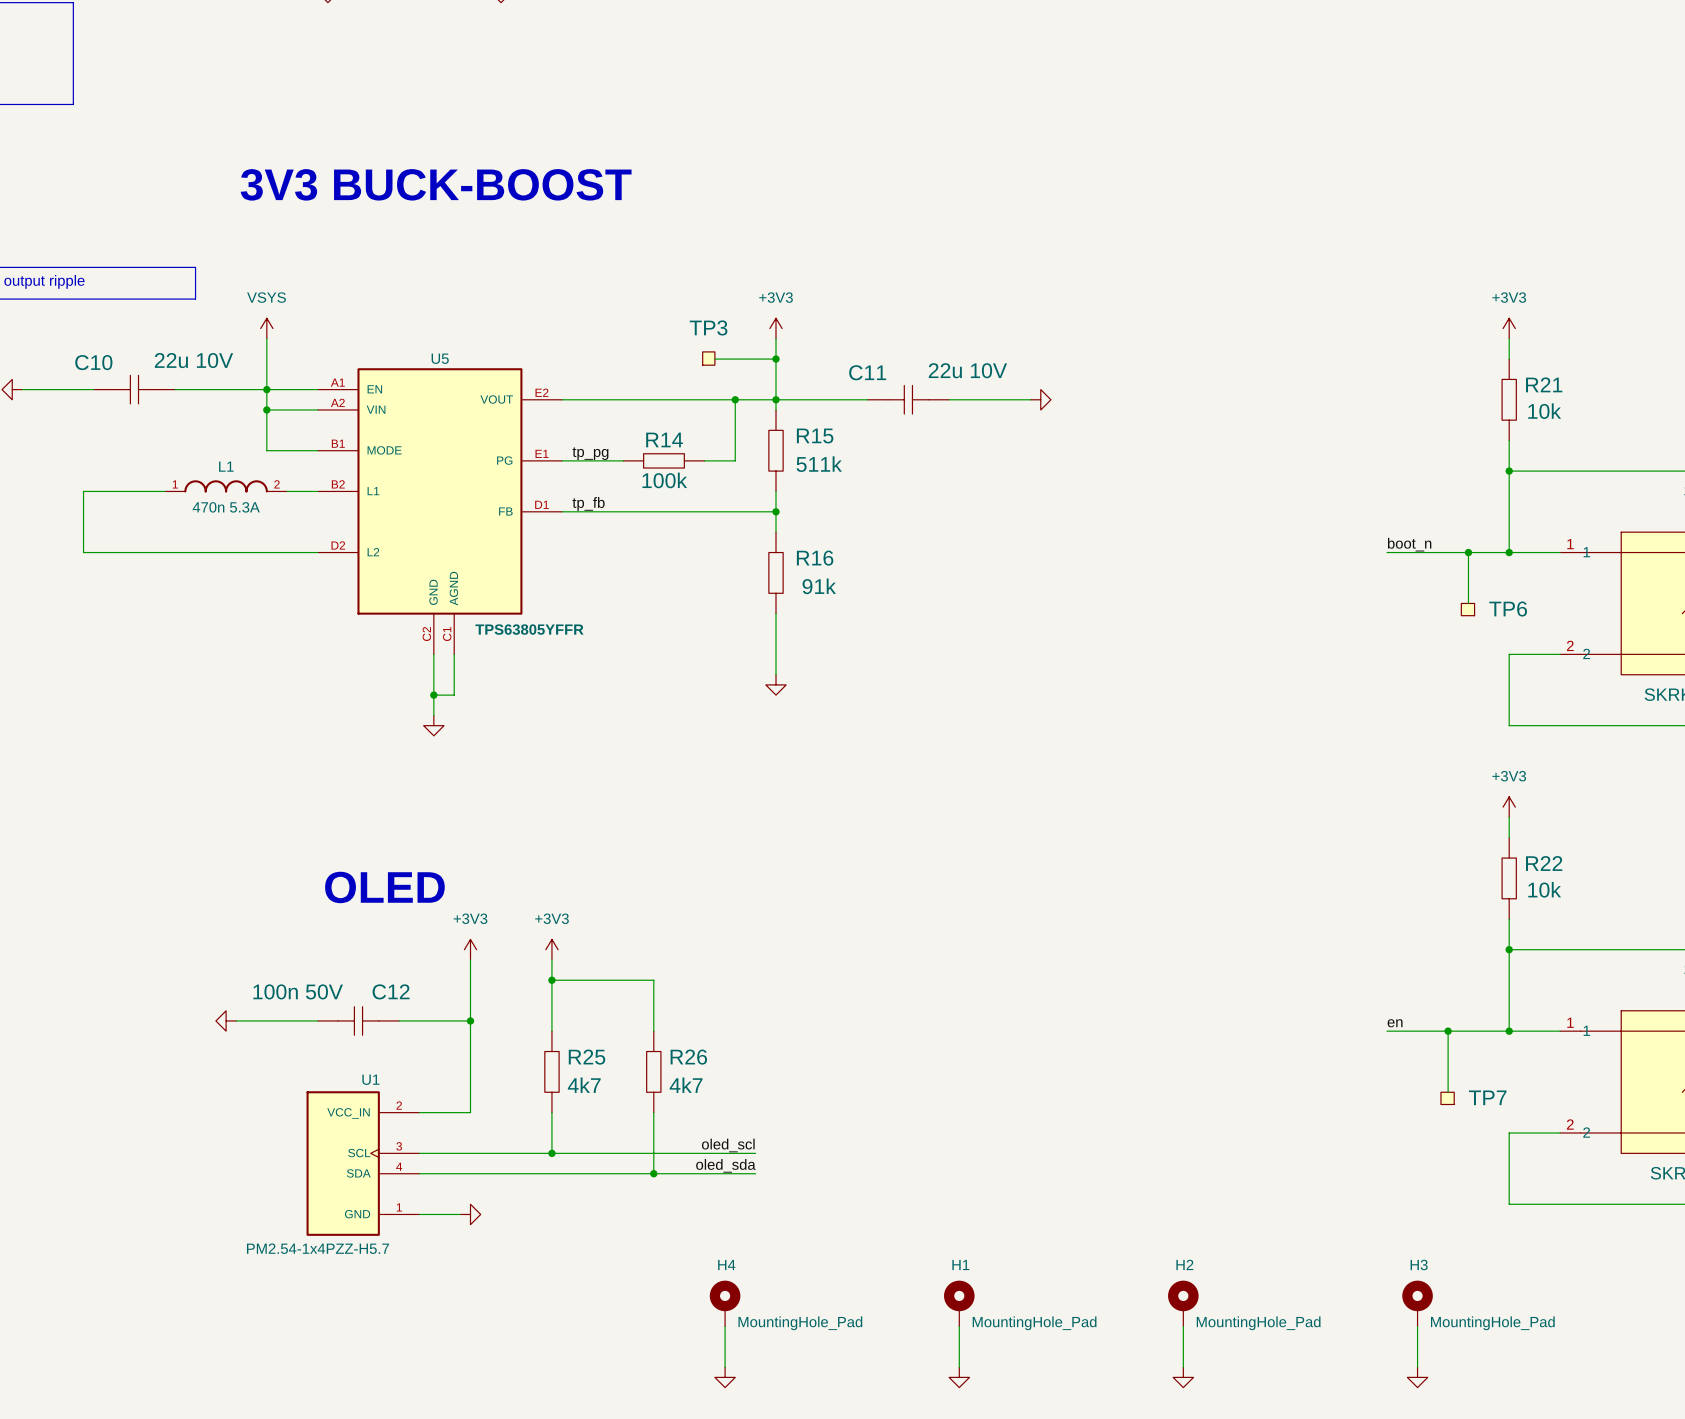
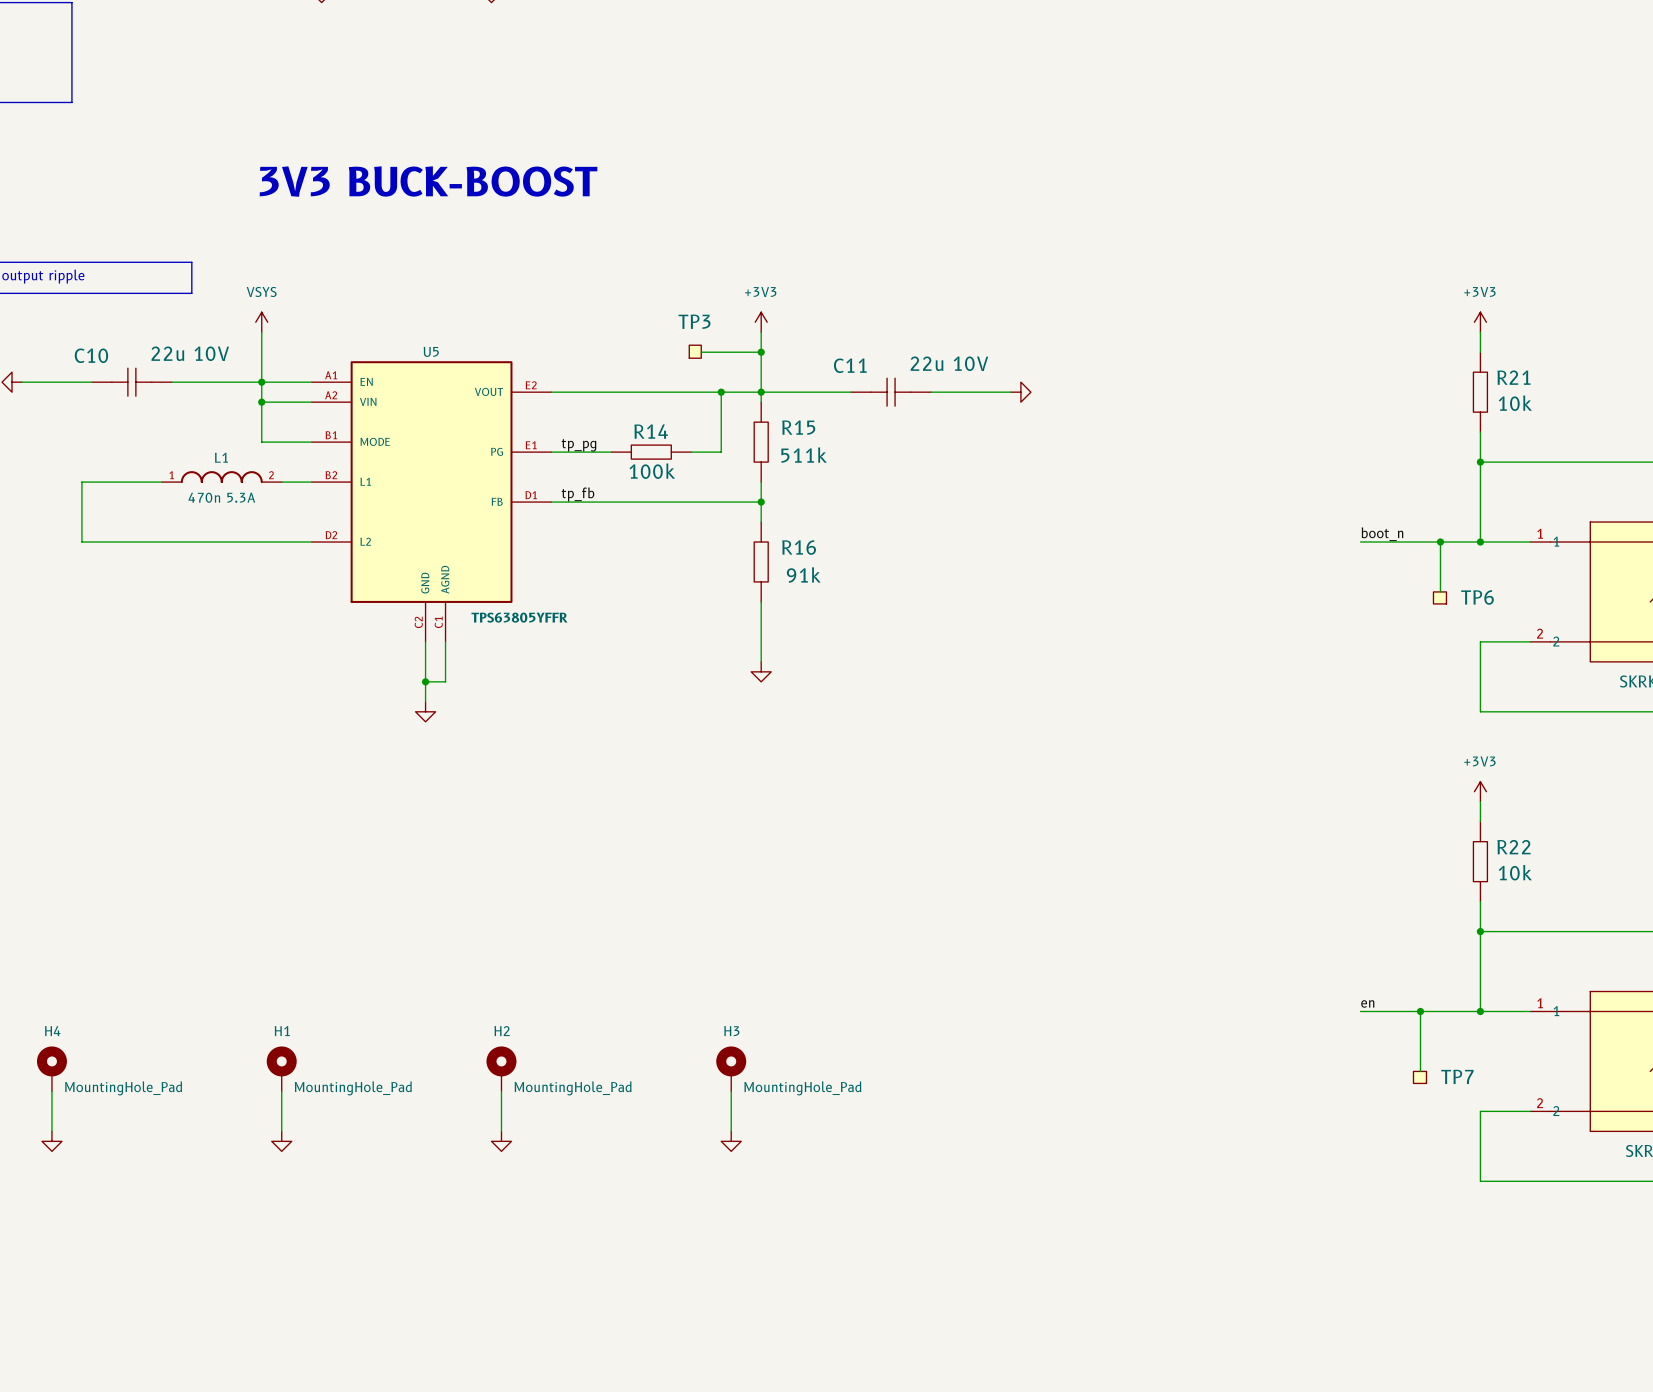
text: OLED (384, 887) -> none
power symbol: +3V3 (470, 949) -> none
power symbol: +3V3 (551, 949) -> none
wire: (470, 959) (470, 1112) (419, 1112) -> none
wire: (551, 959) (551, 1031) -> none
wire: (551, 980) (653, 980) (653, 1031) -> none
junction: (551, 980) -> none
power symbol: (226, 1020) -> none
wire: (236, 1020) (317, 1020) -> none
C12: 100n 50V (358, 1020) -> none
wire: (399, 1020) (470, 1020) -> none
junction: (470, 1020) -> none
R25: 4k7 (551, 1071) -> none
R26: 4k7 (653, 1071) -> none
wire: none -> (51, 1091) (51, 1131)
wire: none -> (281, 1091) (281, 1131)
wire: (551, 1112) (551, 1153) -> (501, 1091) (501, 1131)
wire: (653, 1112) (653, 1173) -> none
wire: none -> (731, 1091) (731, 1131)
label: oled_scl (728, 1145) -> none
wire: (419, 1153) (755, 1153) -> none
junction: (551, 1153) -> none
power symbol: none -> (51, 1141)
power symbol: none -> (281, 1141)
U1: PM2.54-1x4PZZ-H5.7 (363, 1163) -> none
power symbol: none -> (731, 1141)
label: oled_sda (725, 1165) -> none
wire: (419, 1173) (755, 1173) -> none
junction: (653, 1173) -> none
wire: (419, 1214) (460, 1214) -> none
power symbol rotation: 0° (470, 1214) -> 90° clockwise (501, 1141)
power symbol position: (470, 1214) -> (501, 1141)
H4 position: (725, 1303) -> (51, 1068)
H1 position: (959, 1303) -> (281, 1068)
H2 position: (1183, 1303) -> (501, 1068)
H3 position: (1417, 1303) -> (731, 1068)
wire: (725, 1326) (725, 1367) -> none
wire: (959, 1326) (959, 1367) -> none
wire: (1183, 1326) (1183, 1367) -> none
wire: (1417, 1326) (1417, 1367) -> none
power symbol: (725, 1377) -> none
power symbol: (959, 1377) -> none
power symbol: (1183, 1377) -> none
power symbol: (1417, 1377) -> none

